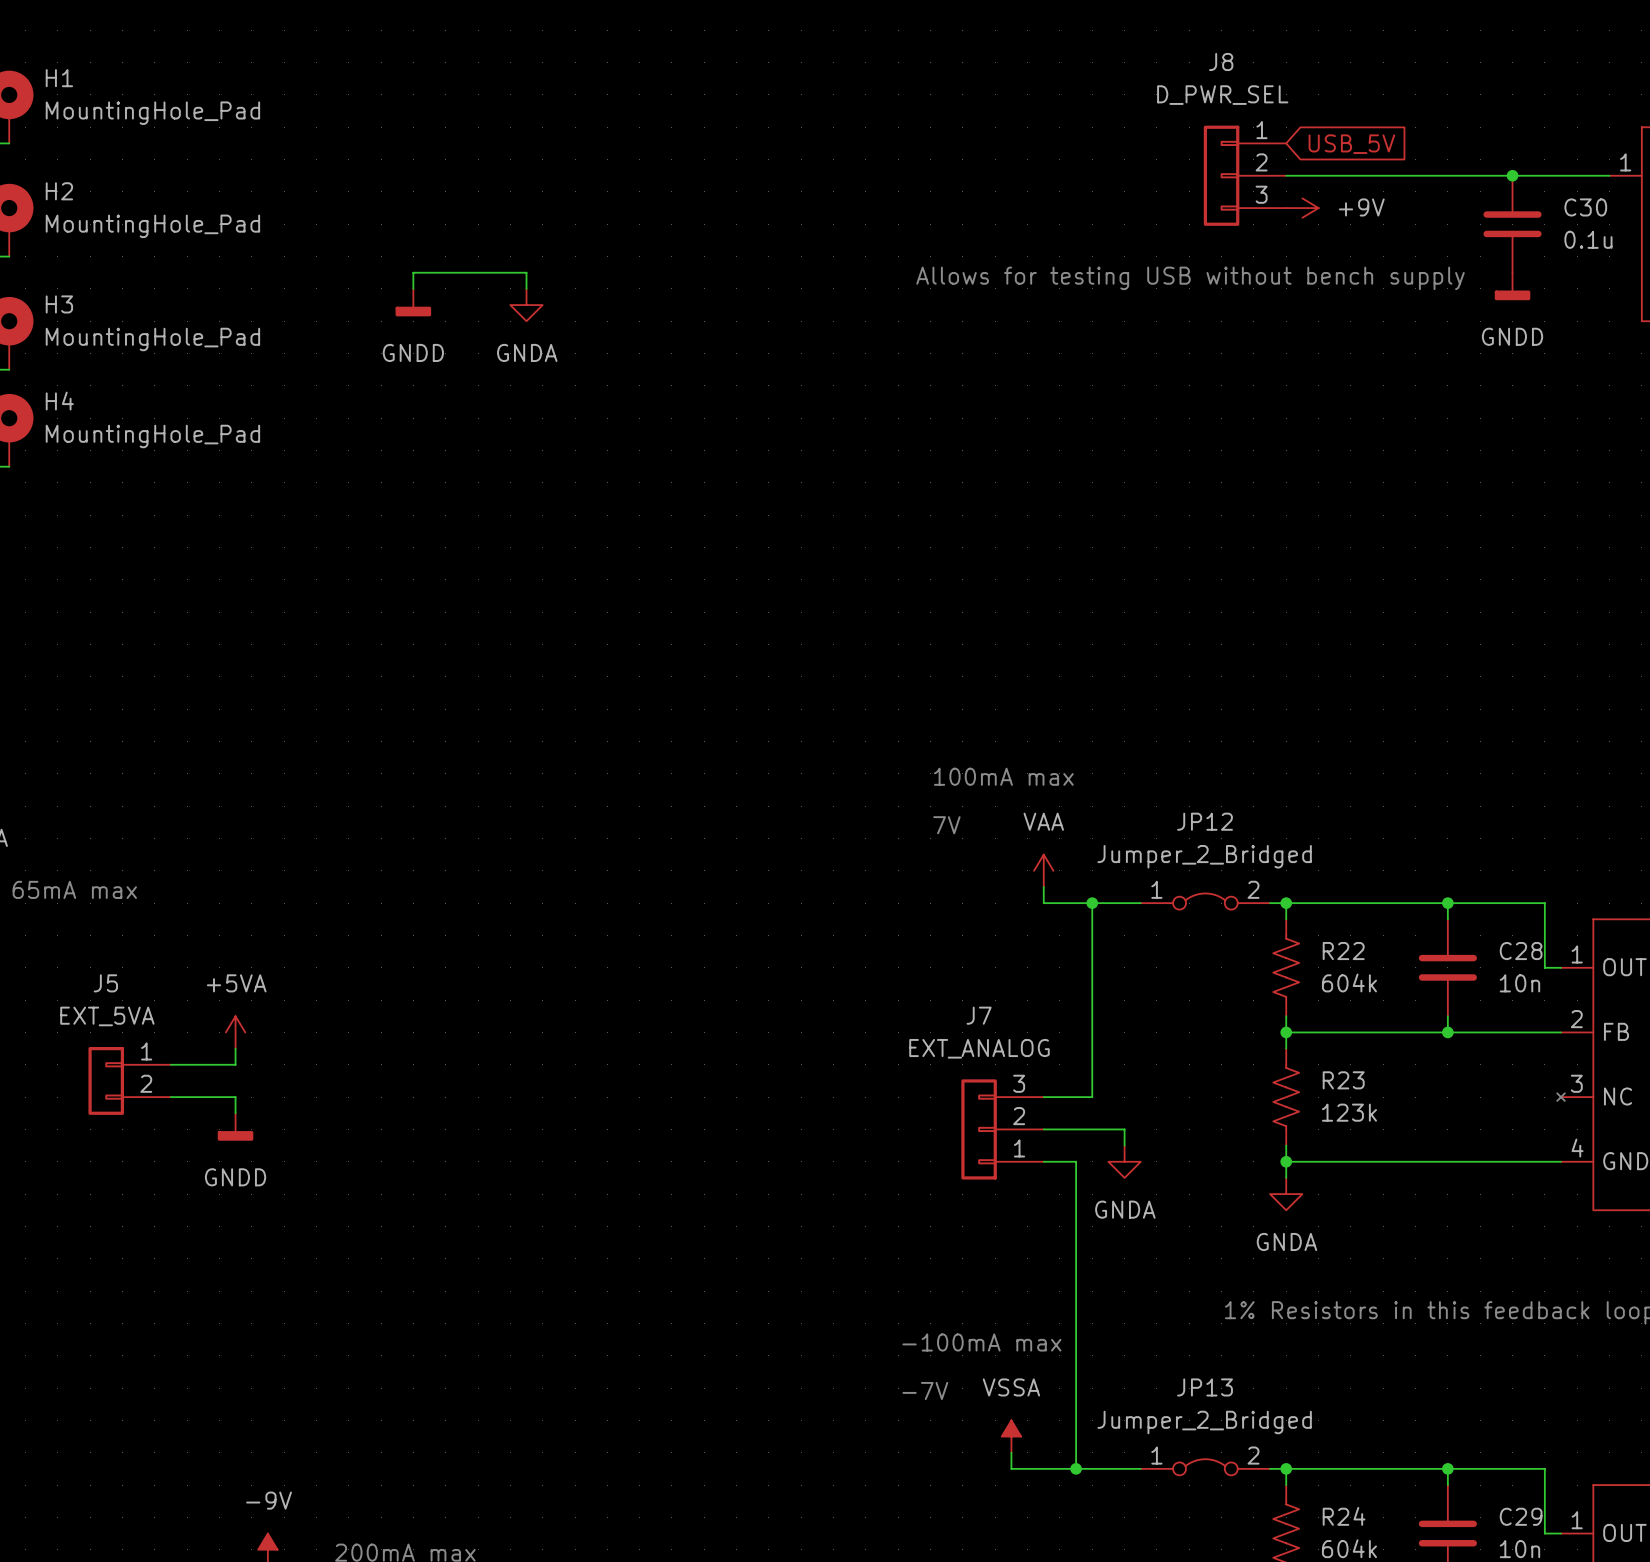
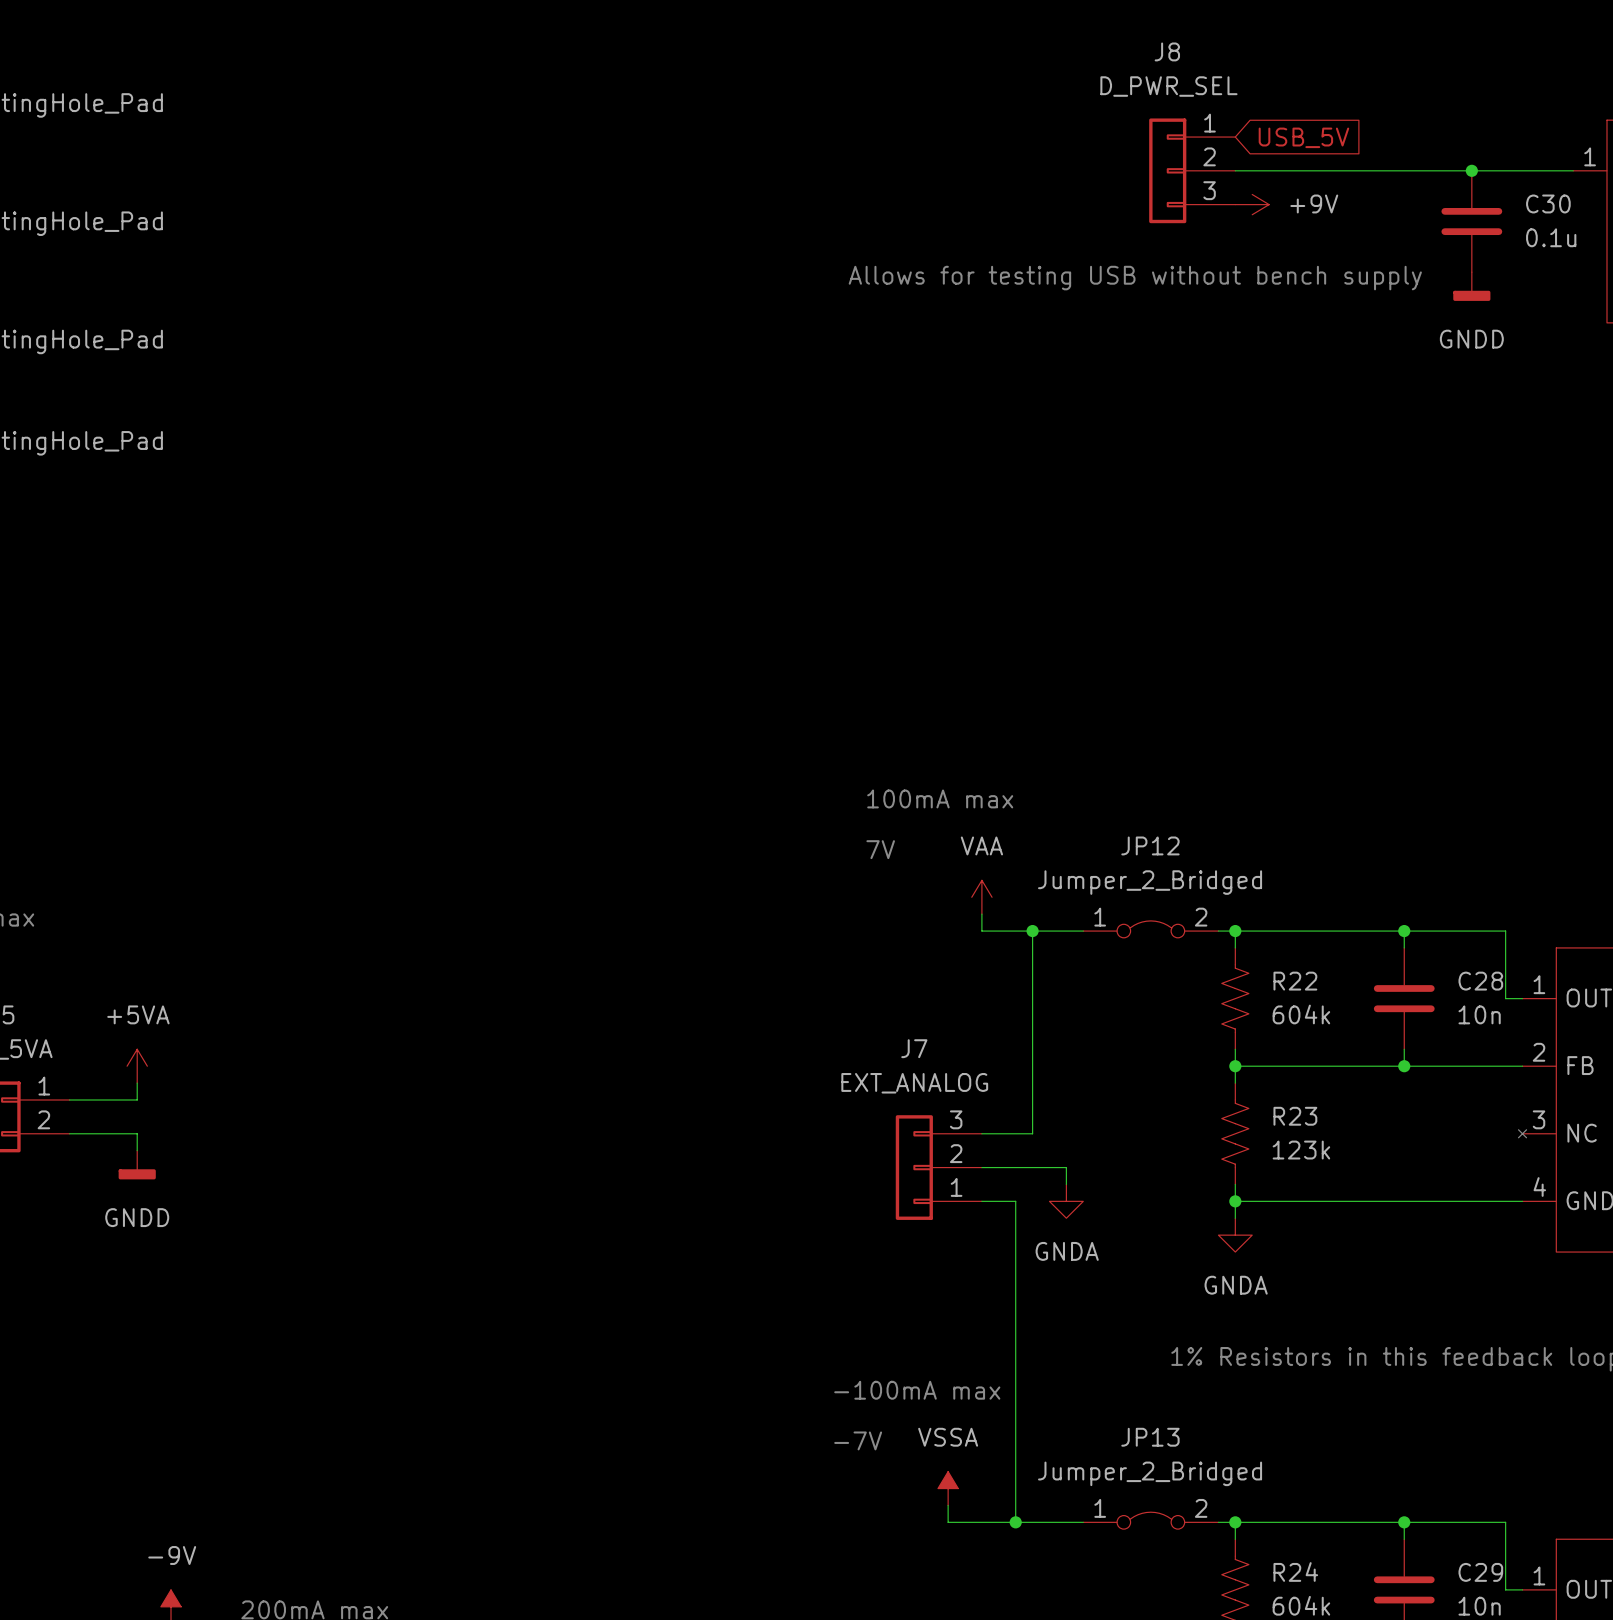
wire: (413, 288) (413, 272) (526, 272) (526, 288) -> none
power symbol: GNDD (413, 302) -> none
power symbol: GNDA (526, 305) -> none

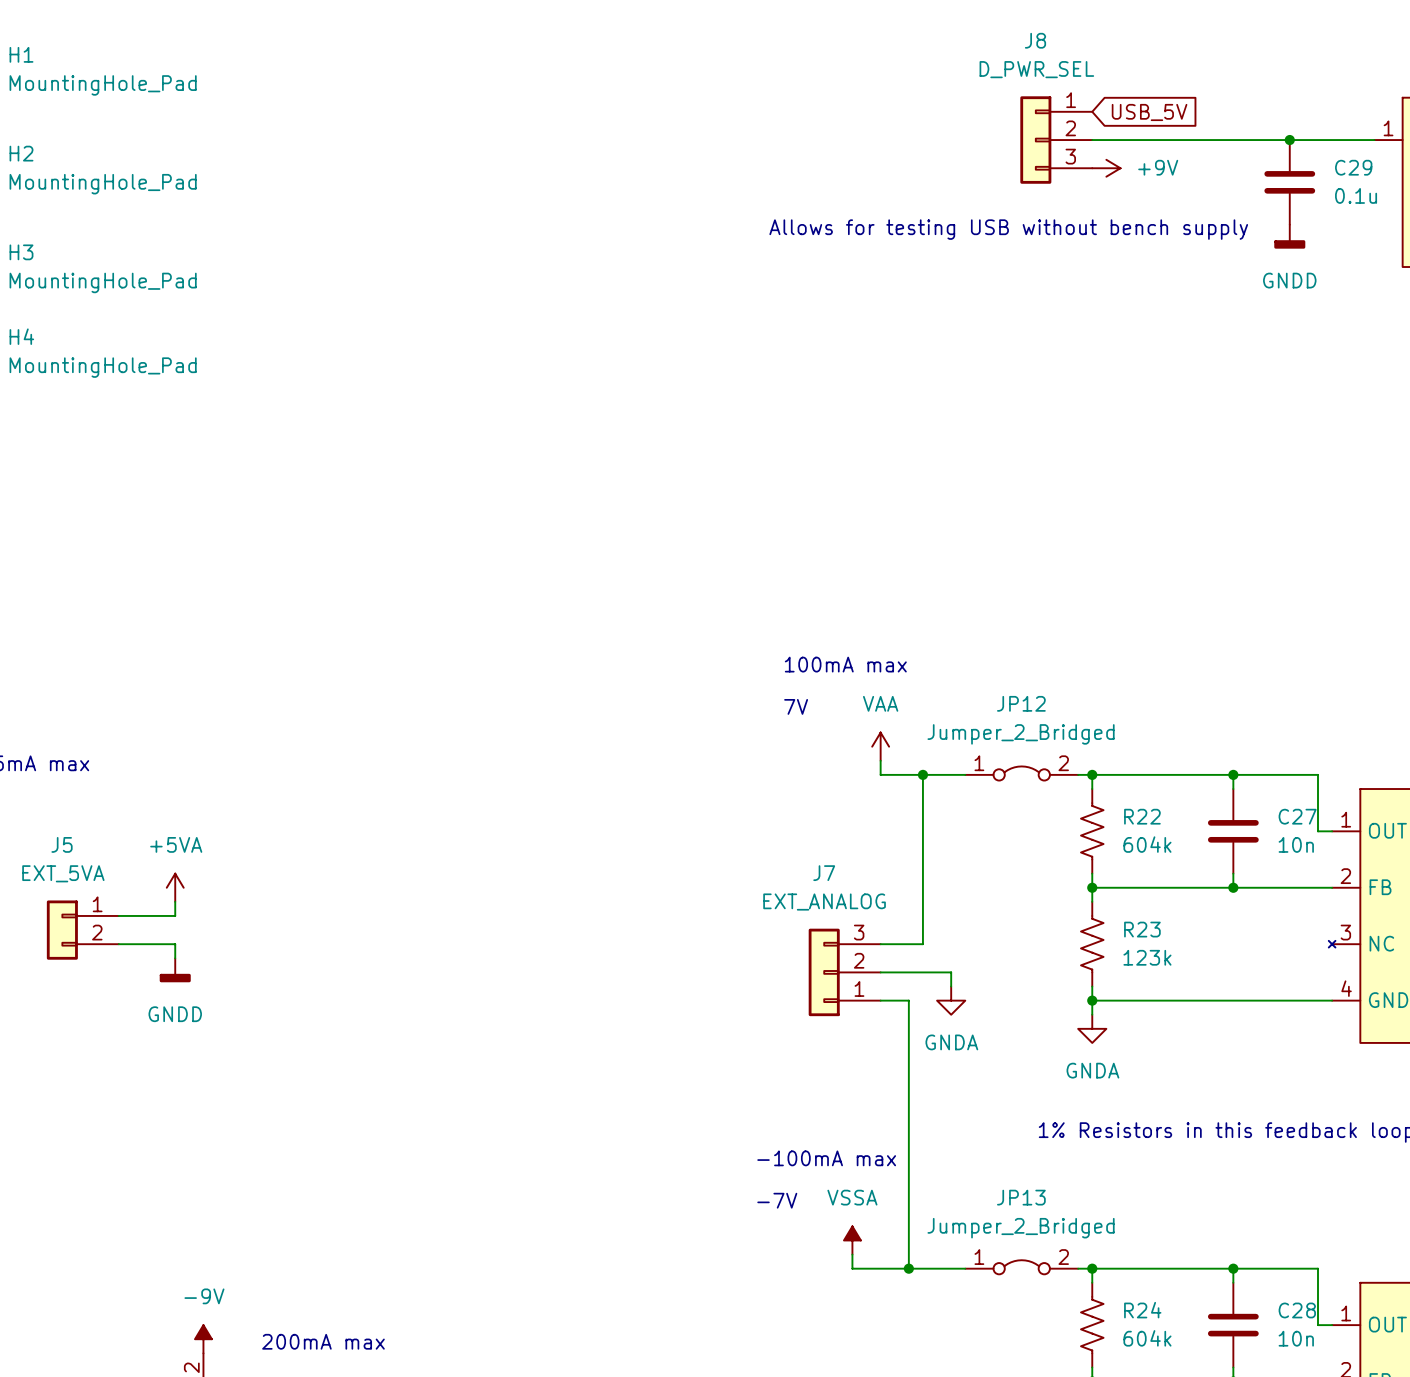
C30 name: C30 (1548, 203) -> C29 (1353, 167)
C28 name: C28 (1480, 981) -> C27 (1297, 816)
C29 name: C29 (1480, 1572) -> C28 (1297, 1310)

